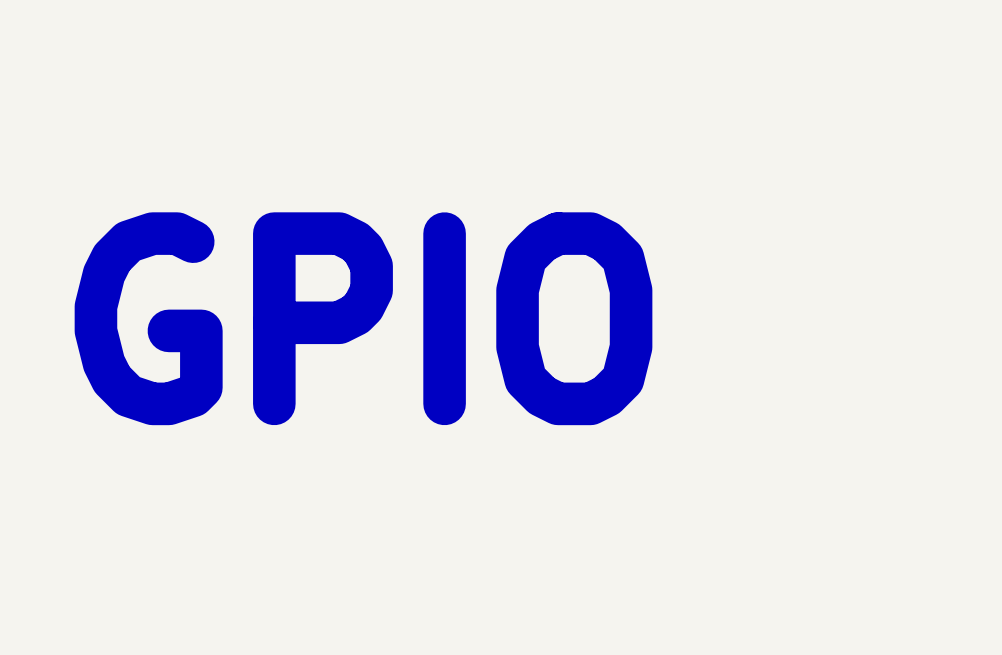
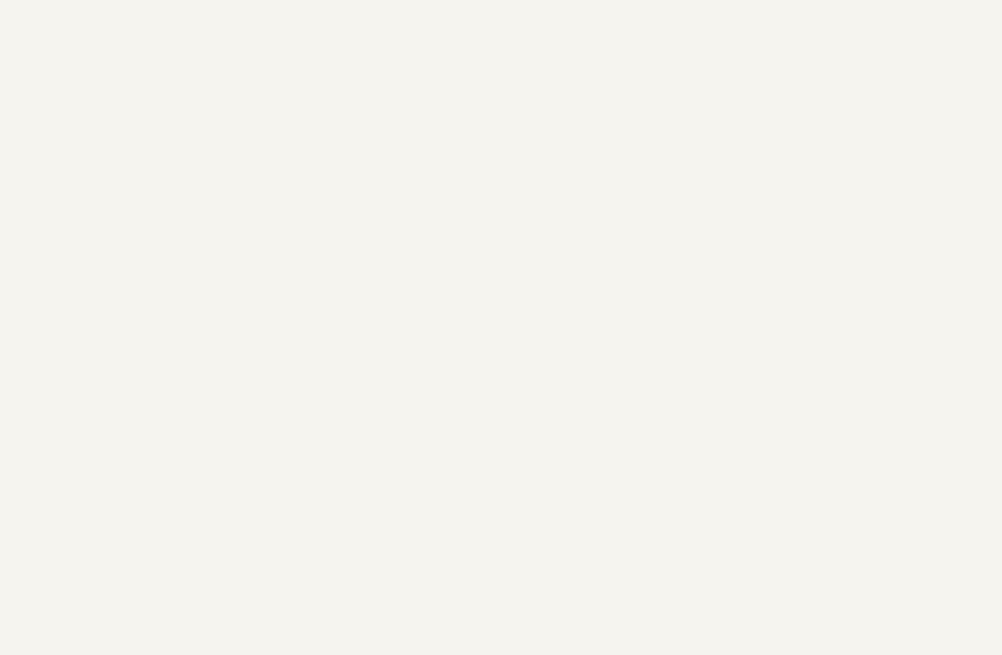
text: GPIO (363, 318) -> none

